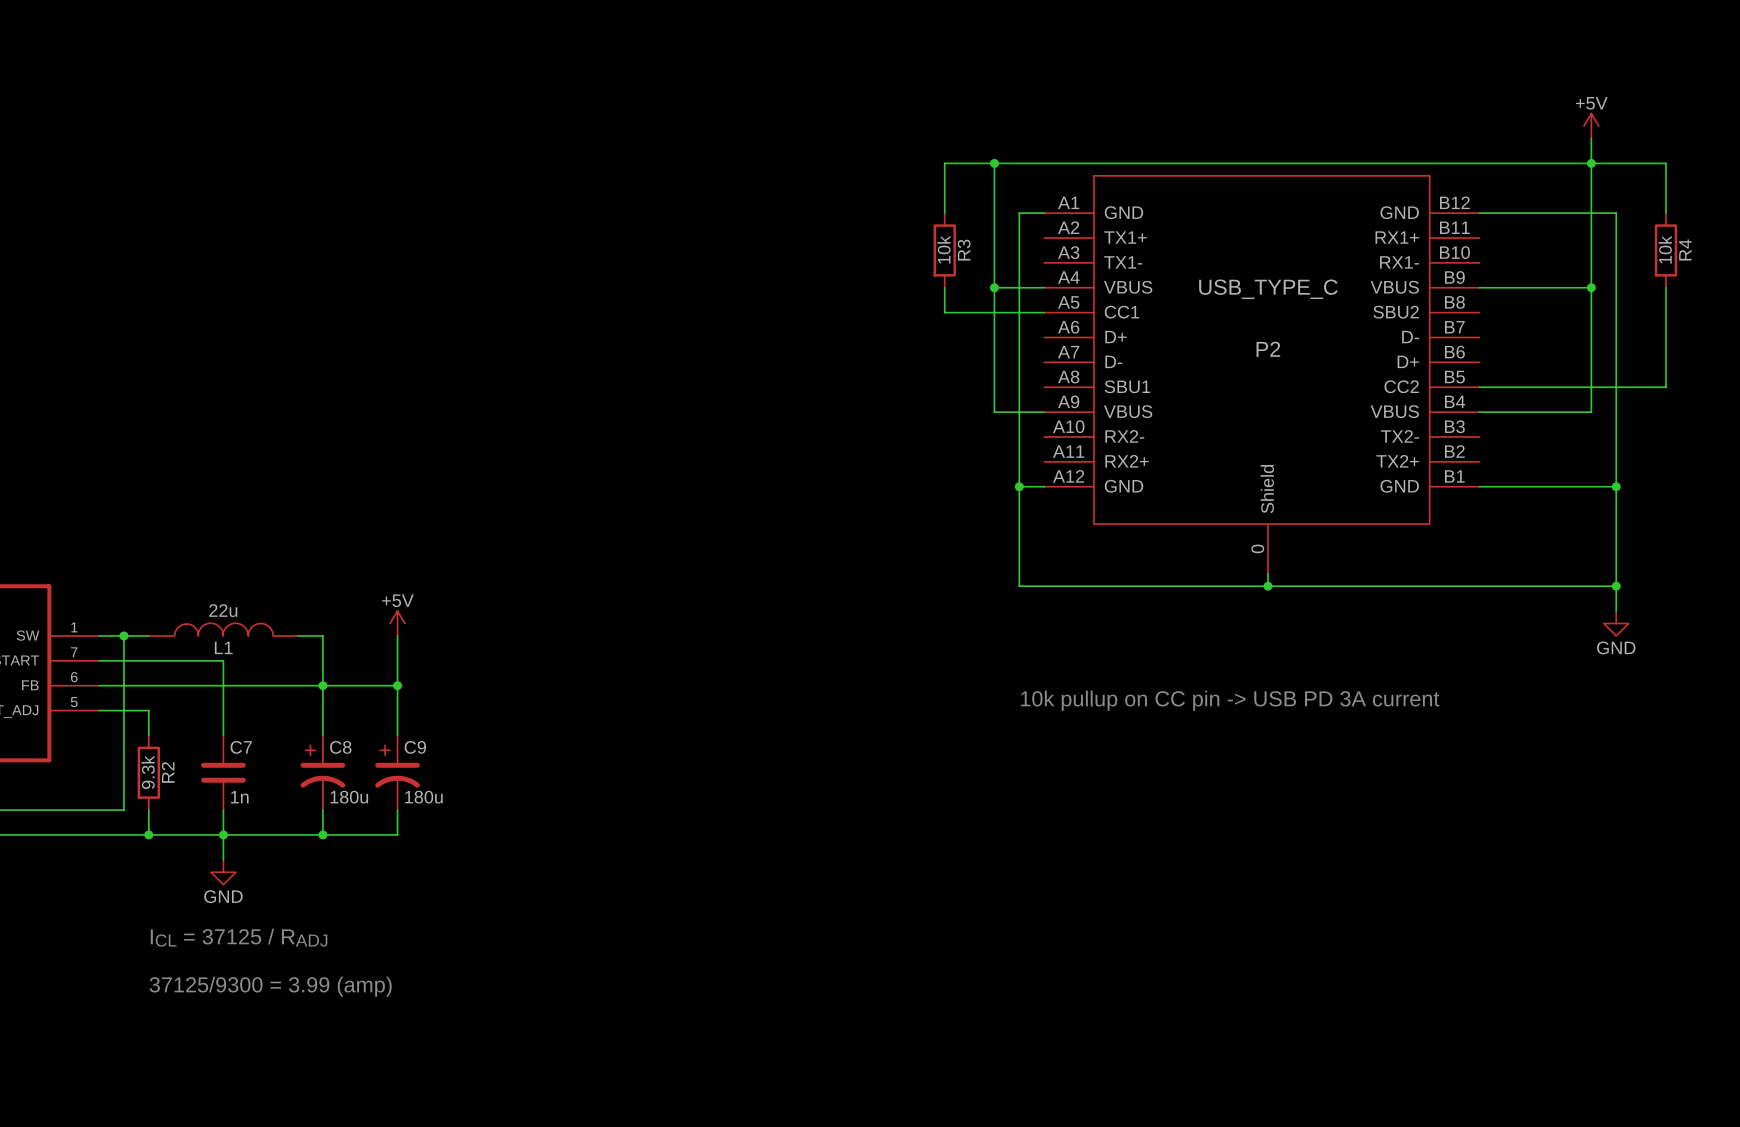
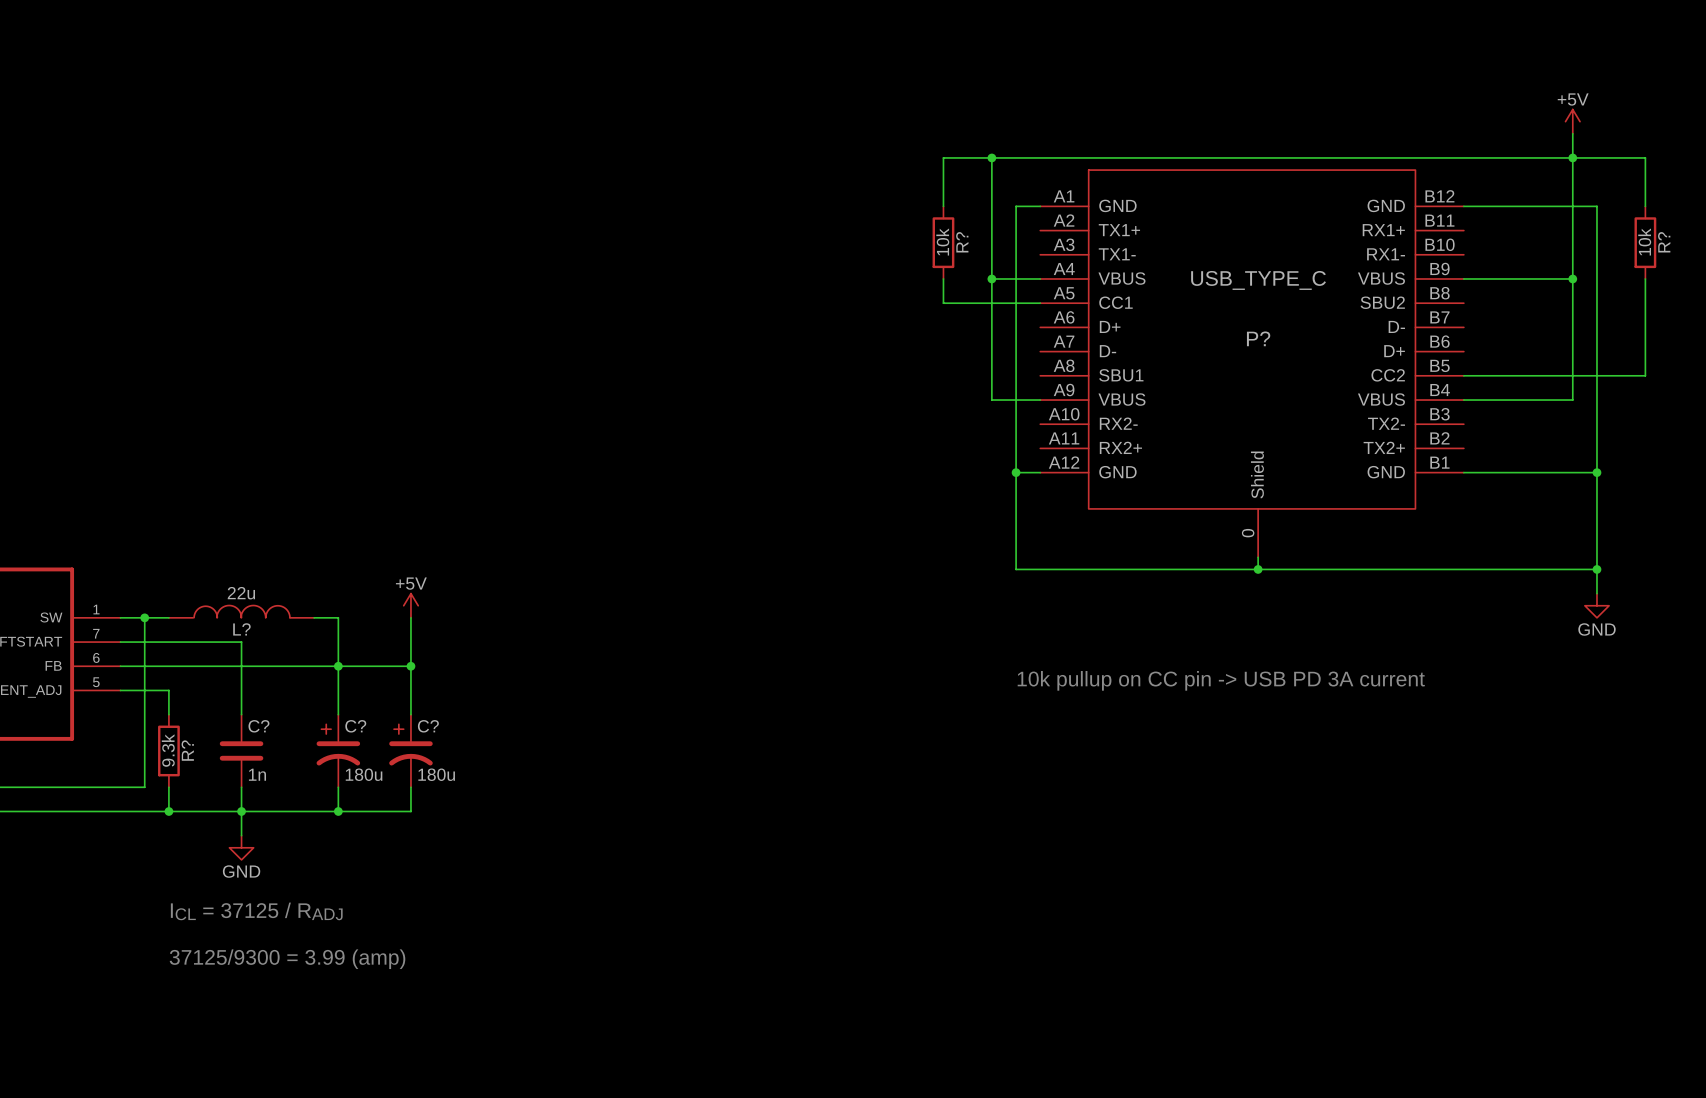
R4 name: R4 (1685, 249) -> R? (1664, 242)
R3 name: R3 (964, 250) -> R? (962, 242)
P2 name: P2 (1268, 349) -> P? (1258, 338)
L1 name: L1 (223, 647) -> L? (241, 629)
C7 name: C7 (241, 747) -> C? (258, 726)
C8 name: C8 (340, 747) -> C? (355, 726)
C9 name: C9 (415, 747) -> C? (428, 726)
R2 name: R2 (168, 772) -> R? (187, 750)

